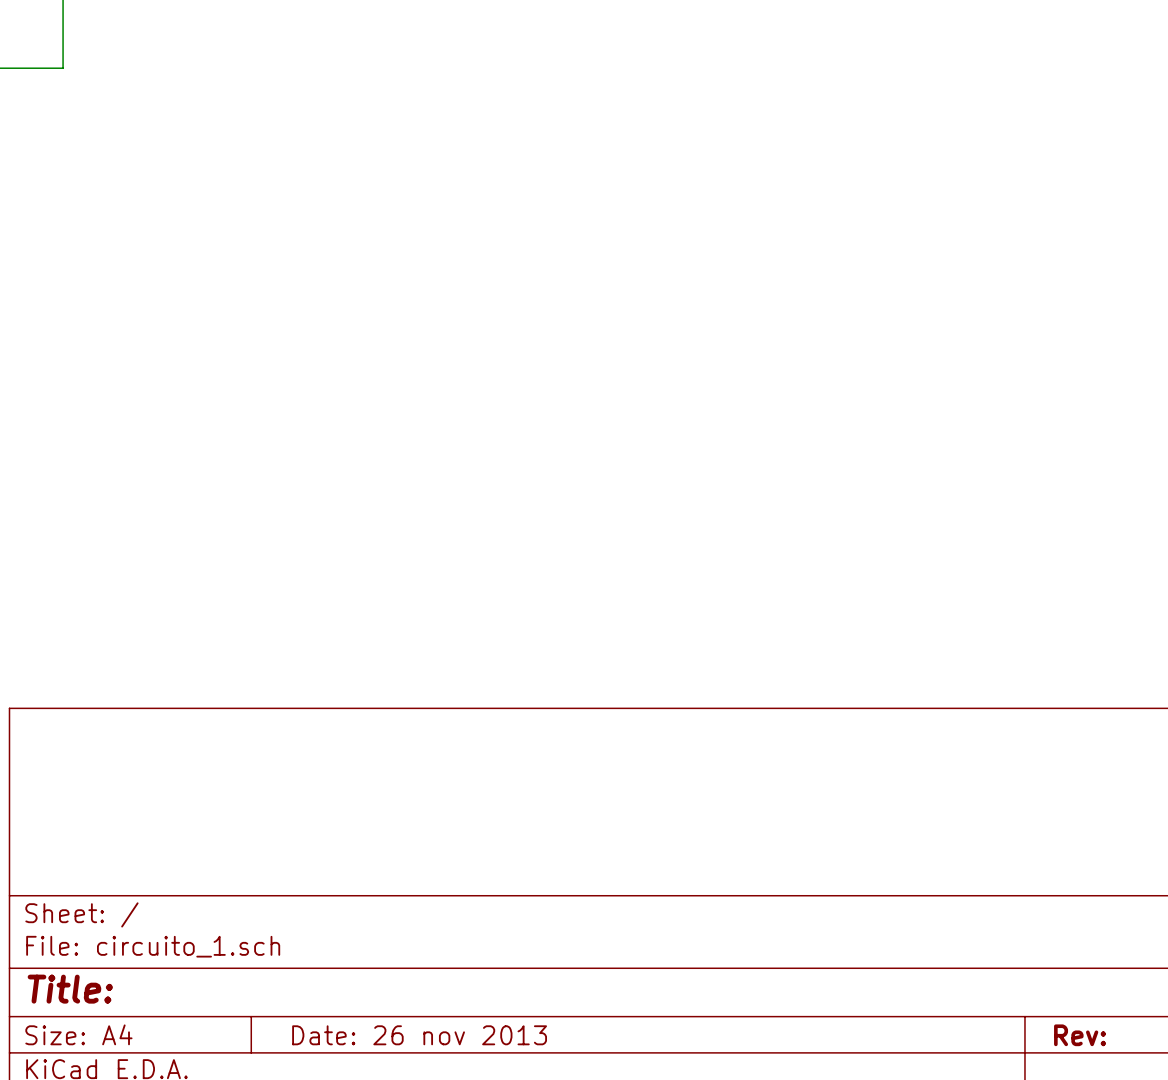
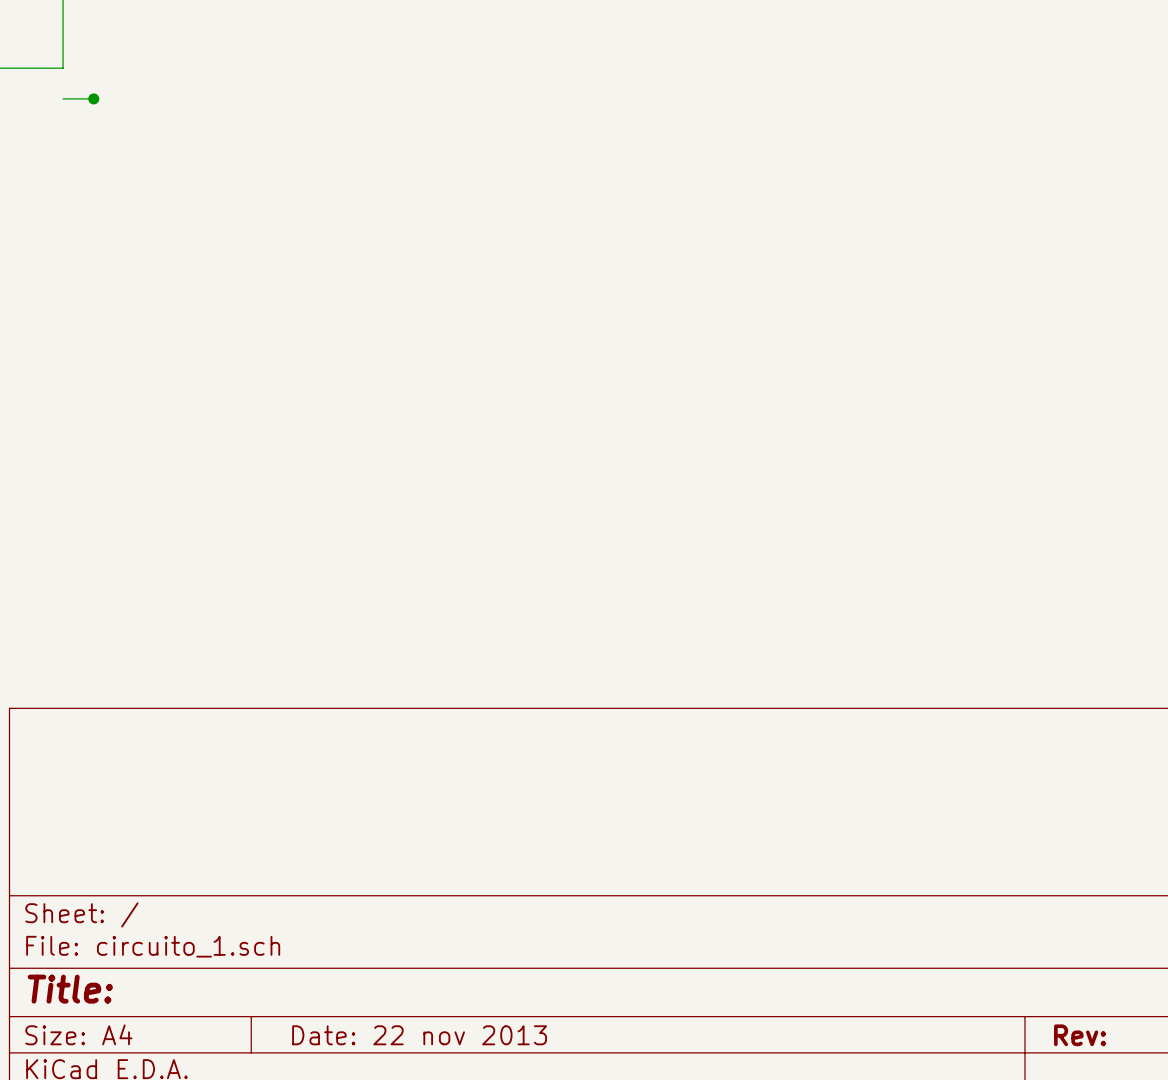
wire: none -> (63, 98) (93, 98)
junction: none -> (93, 98)
title block: Date: 26 nov 2013 (419, 1035) -> Date: 22 nov 2013 (419, 1035)

